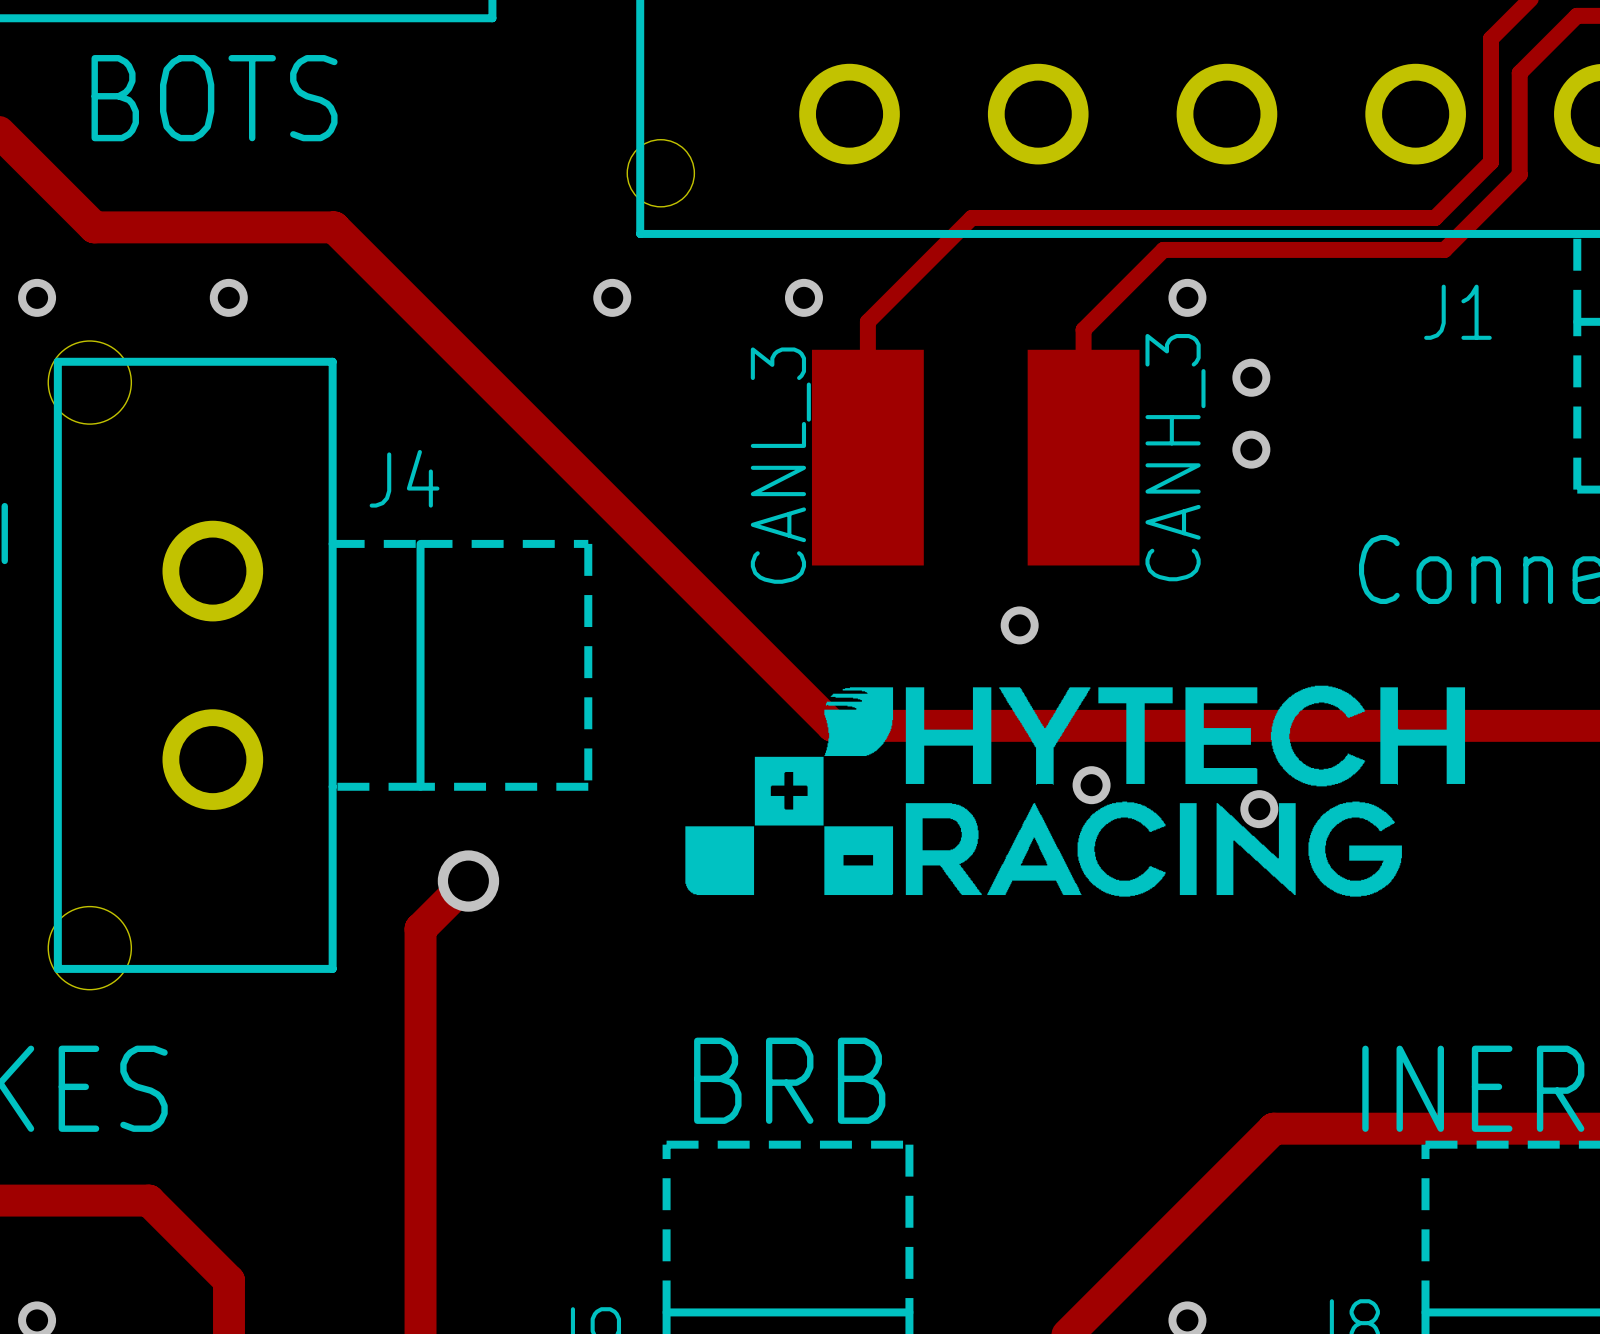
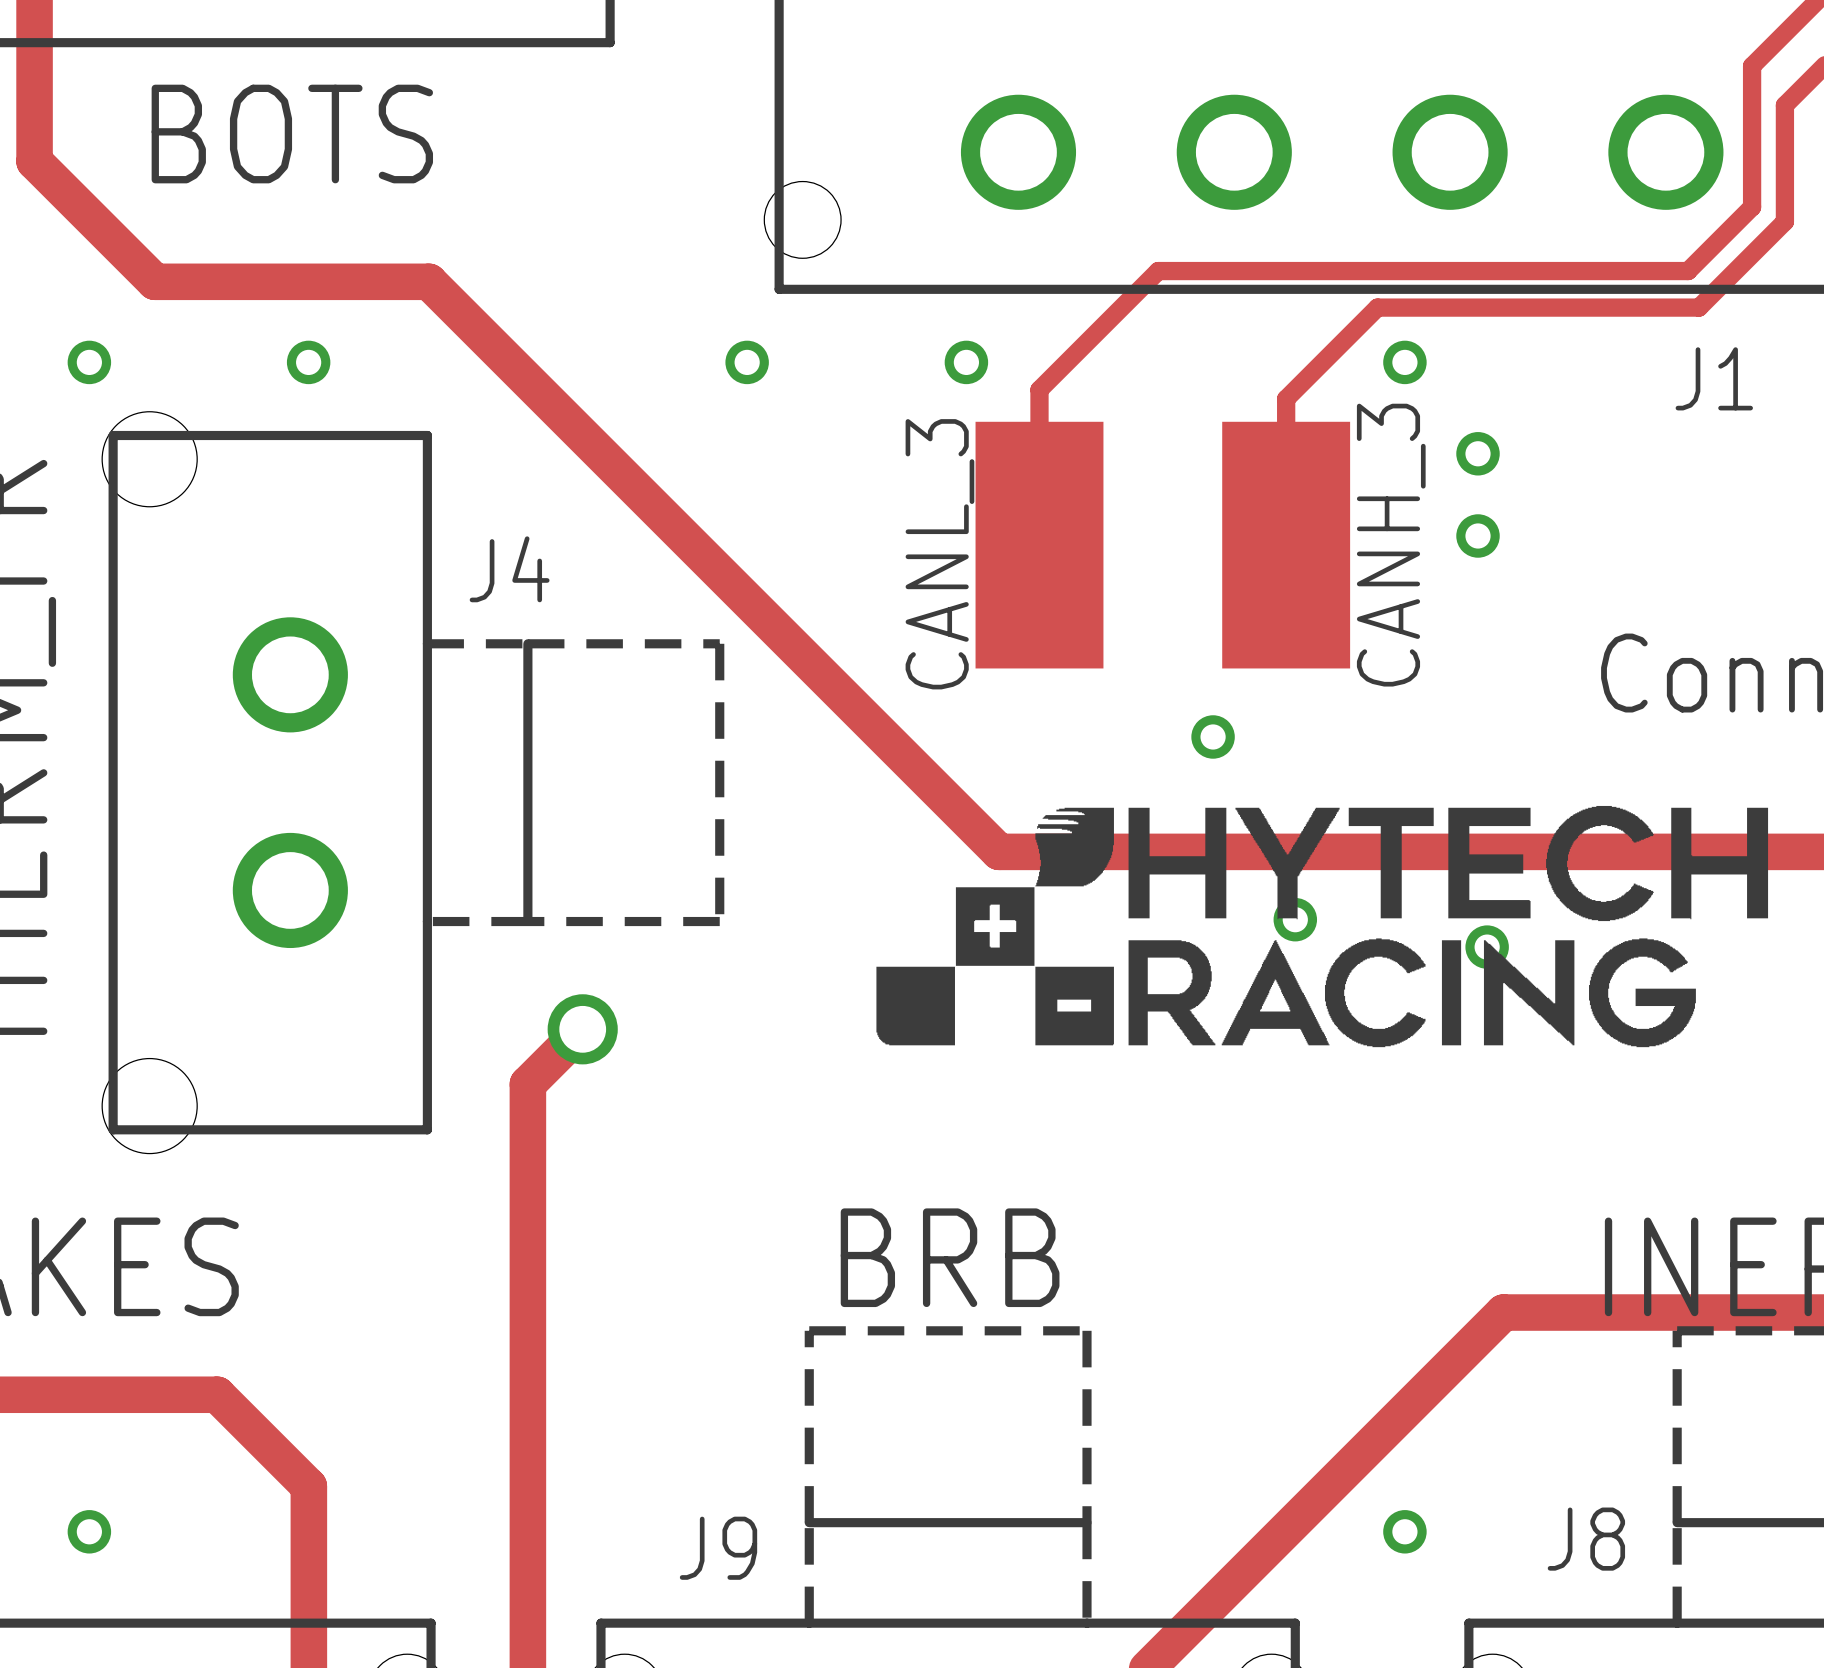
drawing position: (1075, 791) -> (1322, 926)

